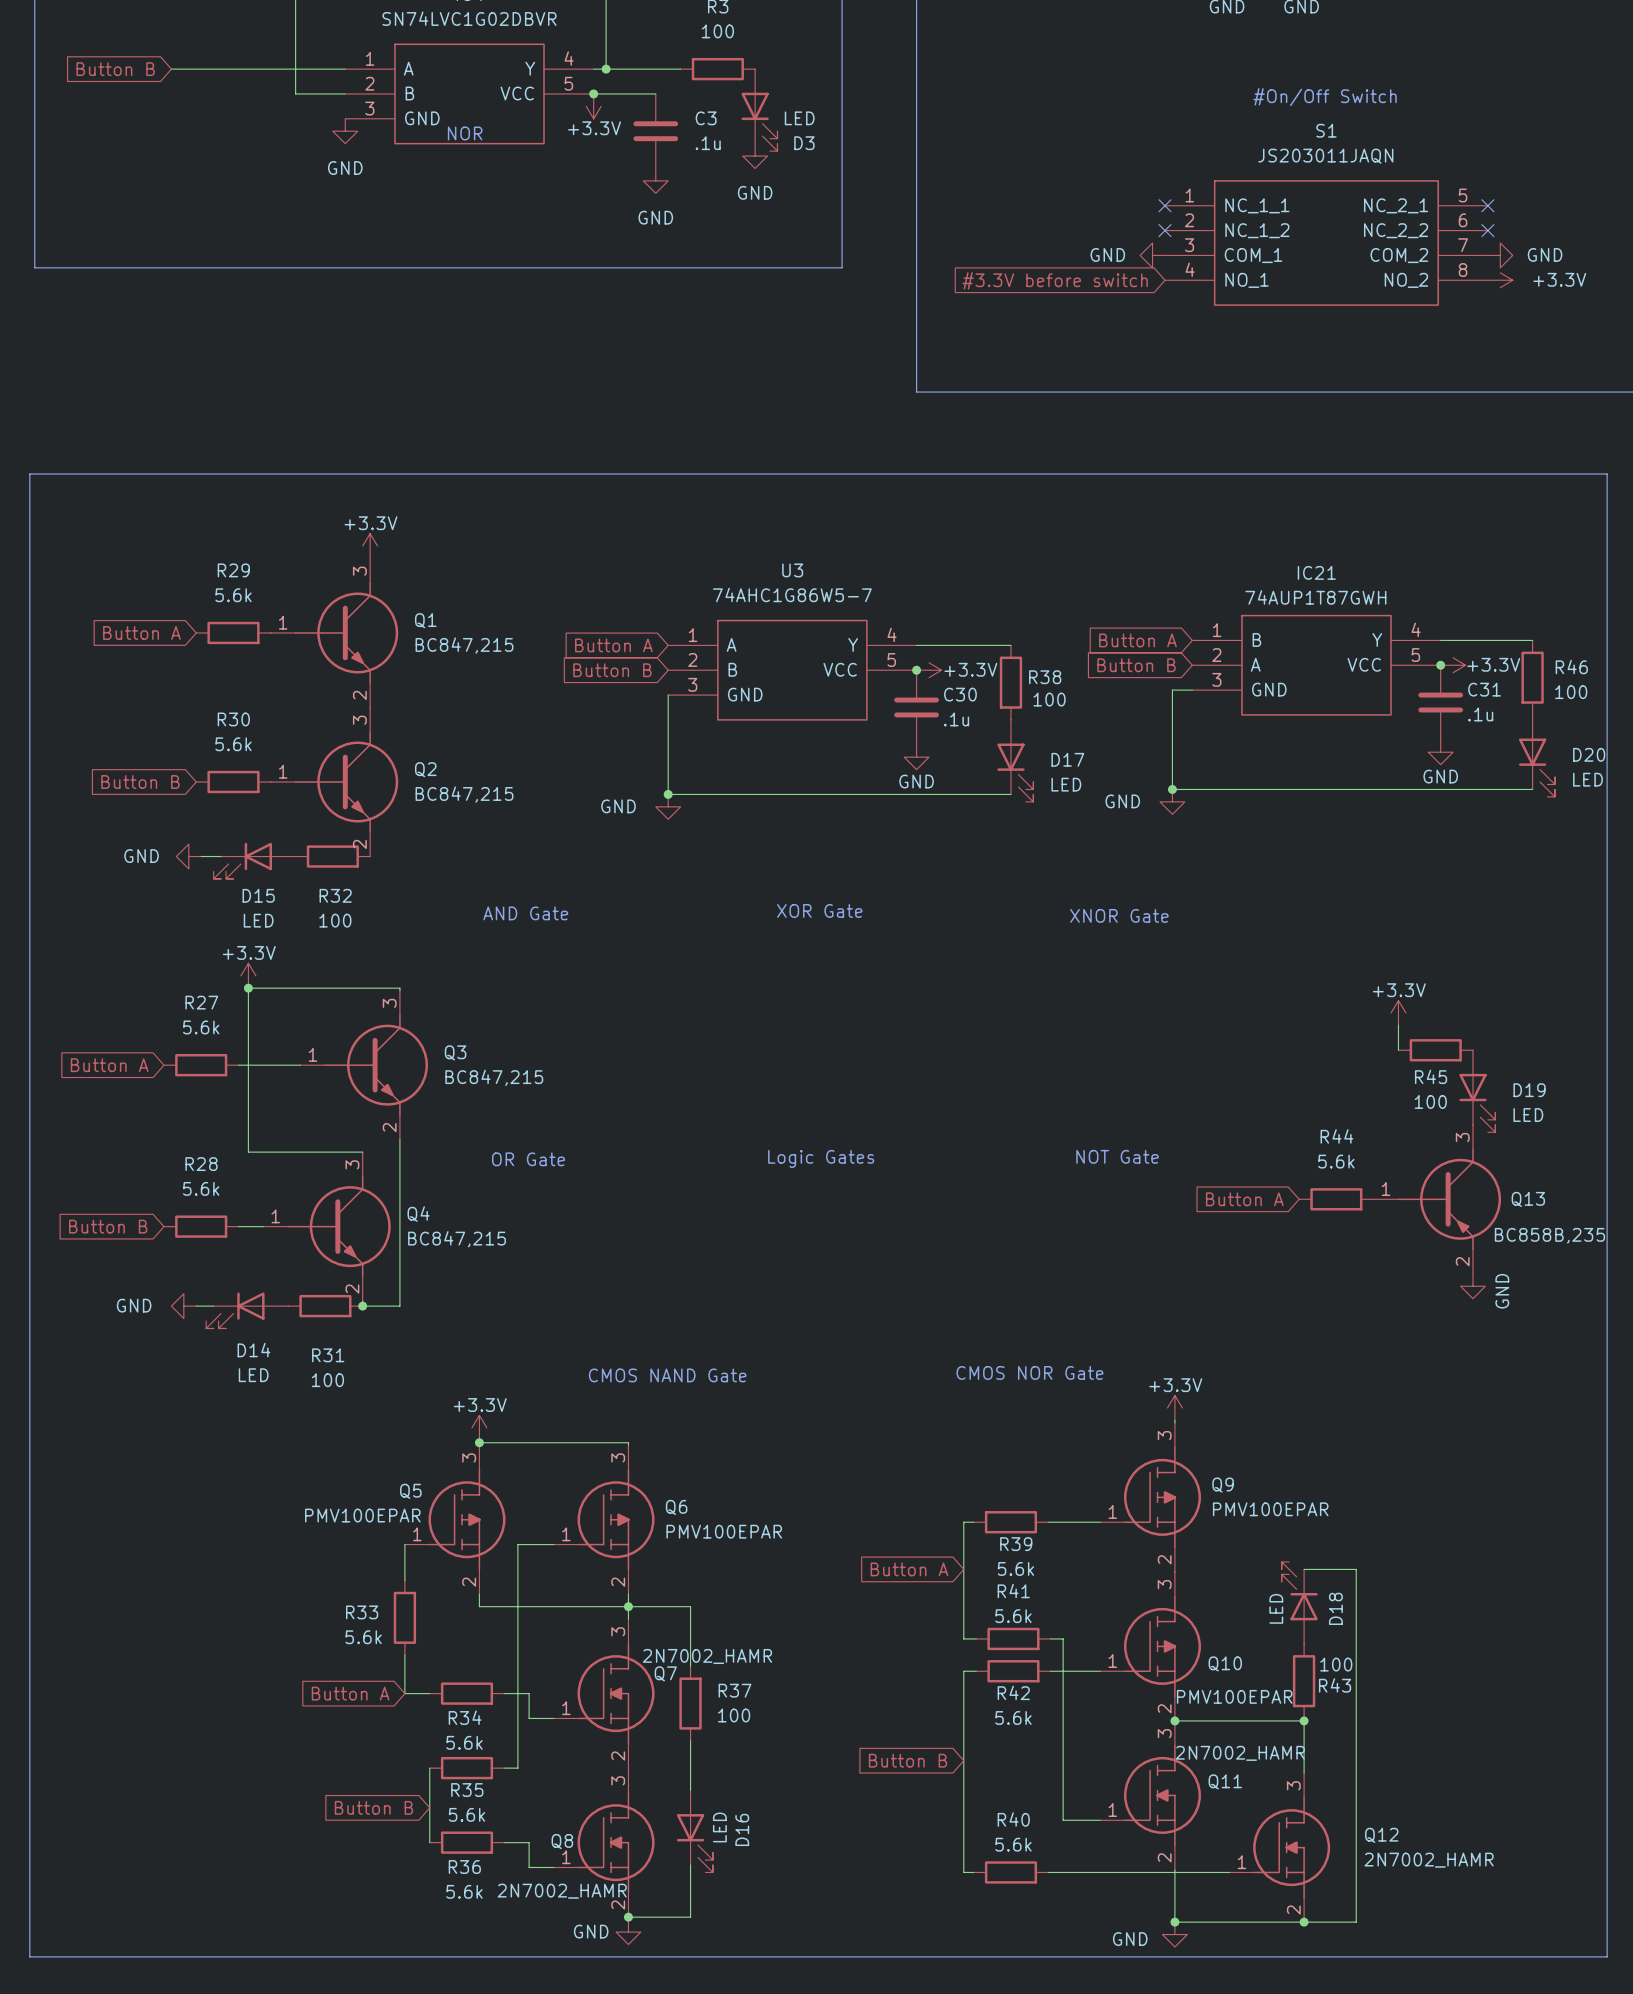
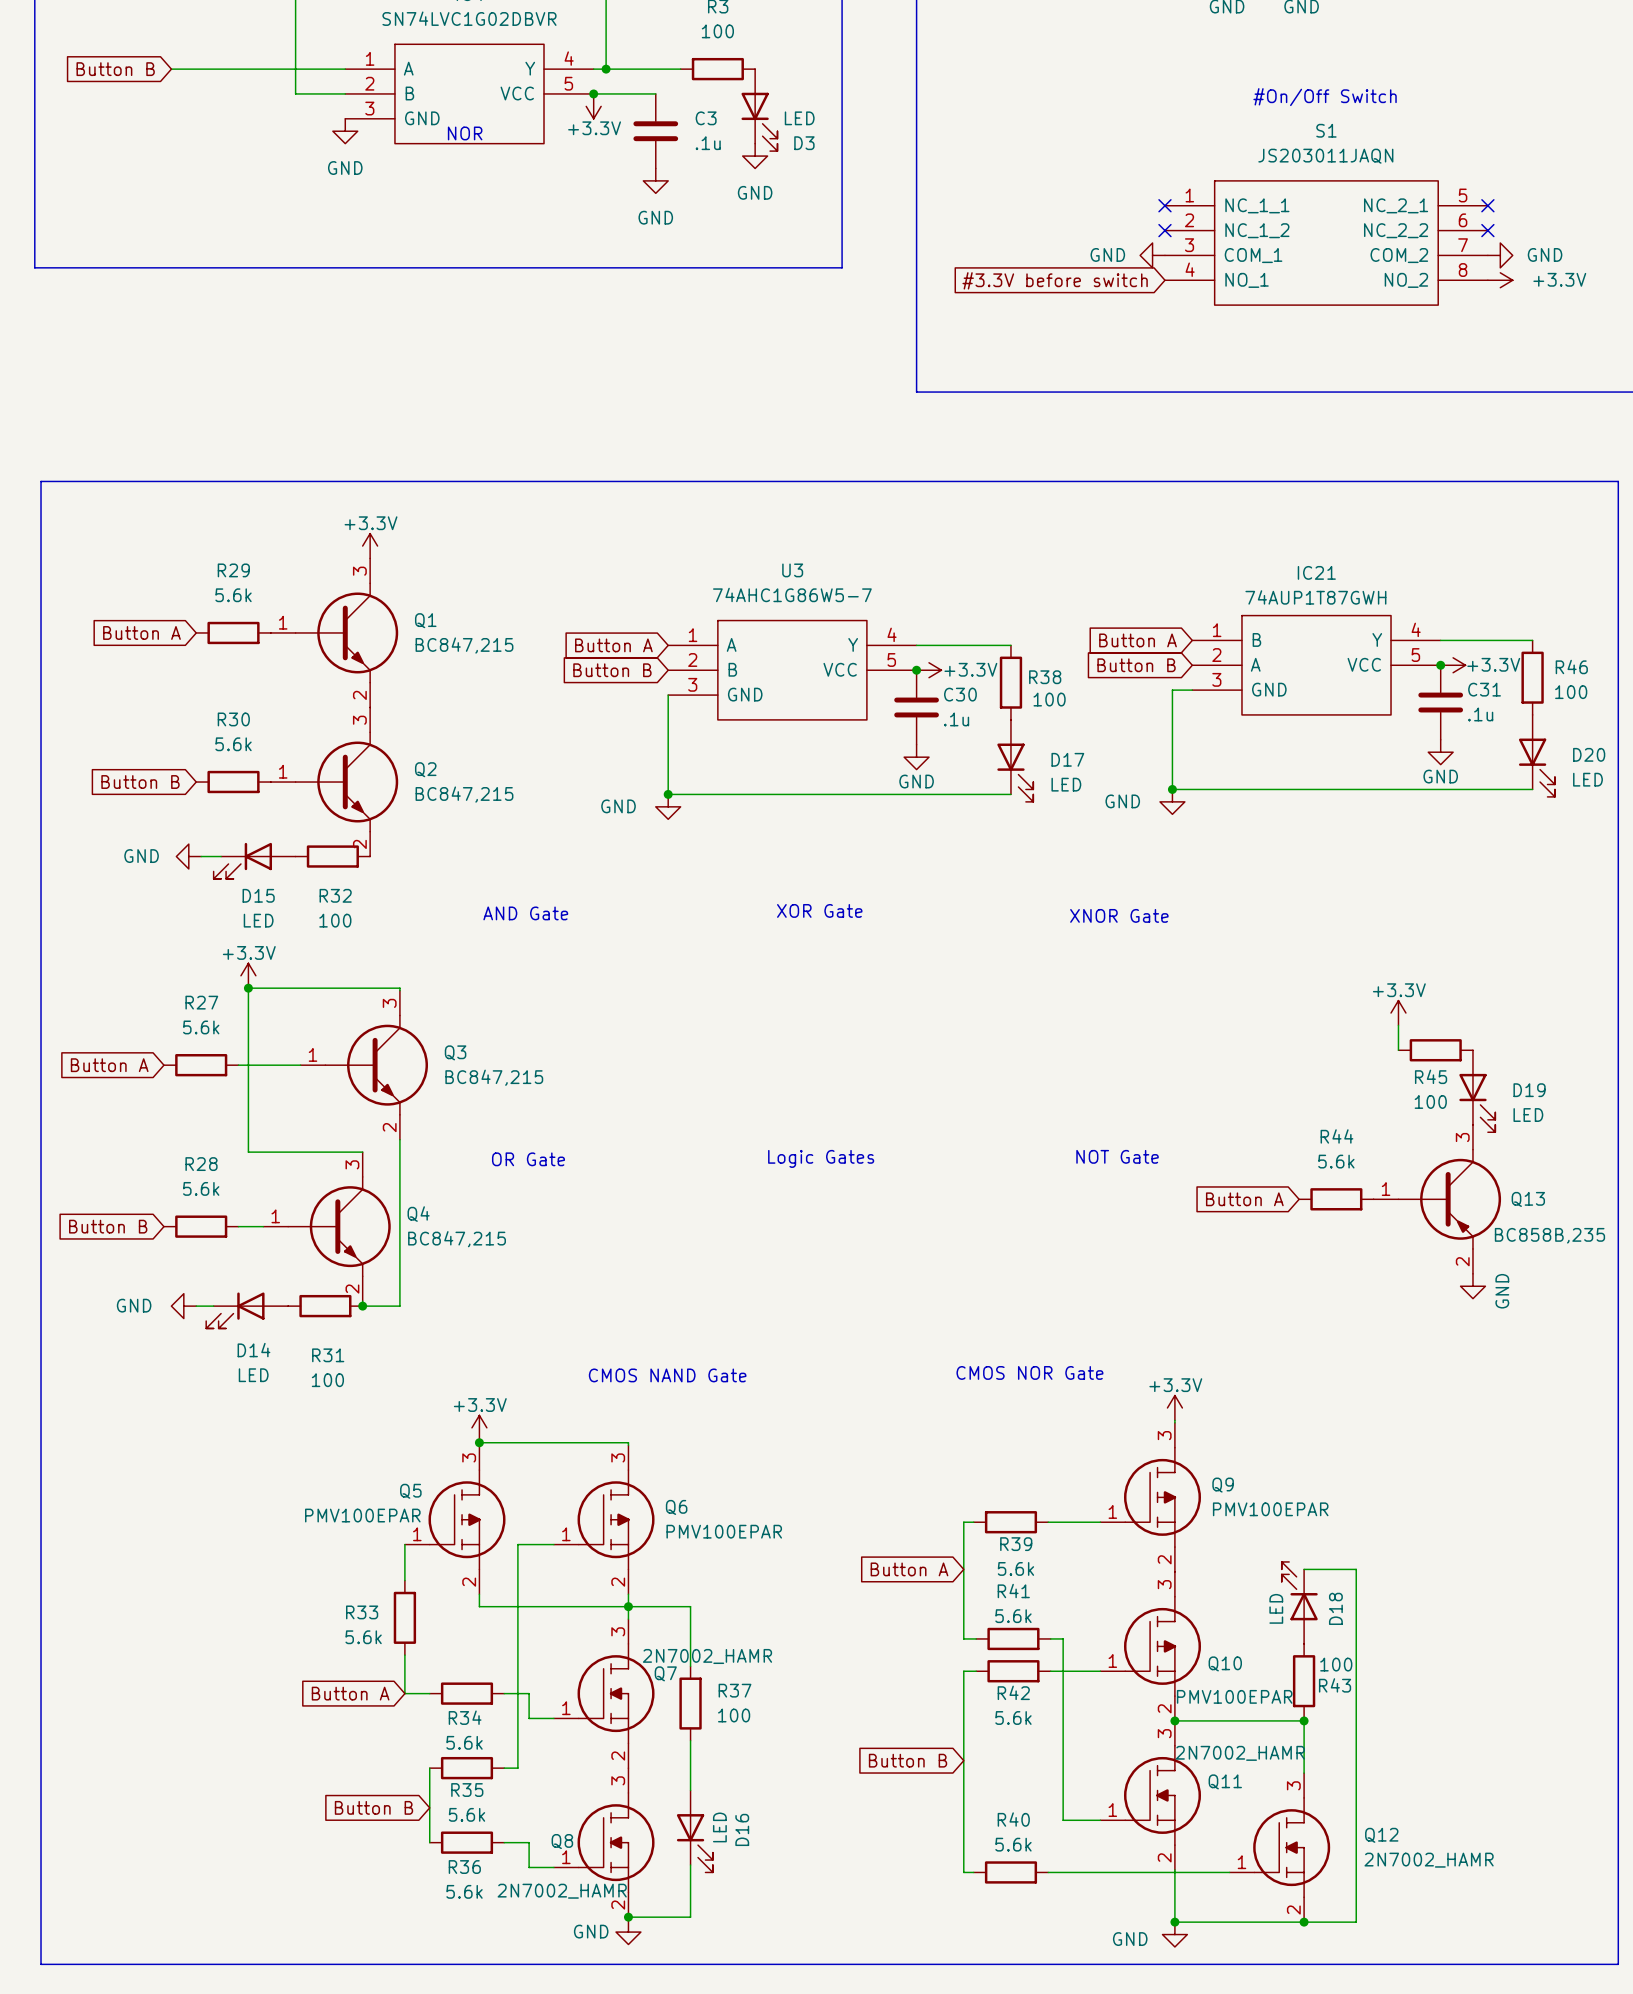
line: (29, 474) (1607, 474) (1607, 1956) (29, 1956) (29, 474) -> (41, 481) (1618, 481) (1618, 1964) (41, 1964) (41, 481)

